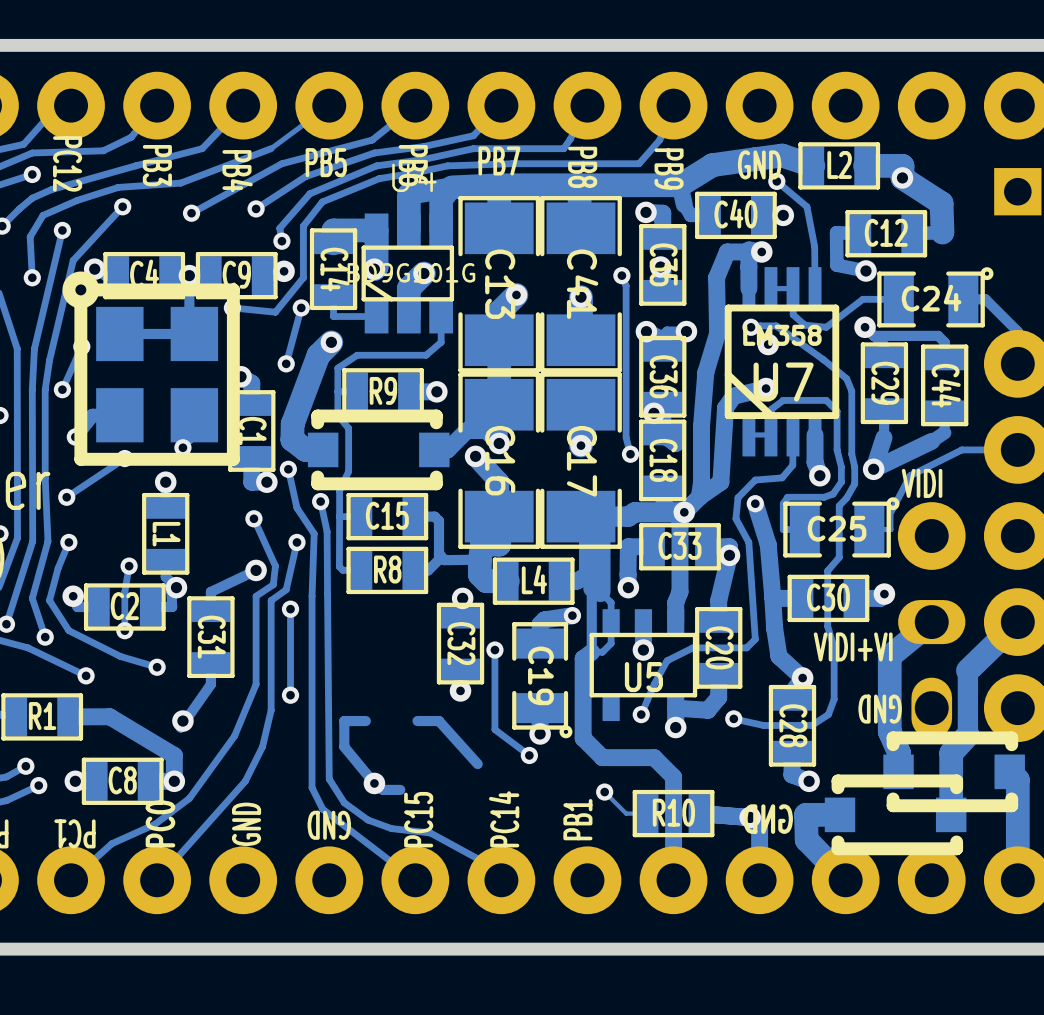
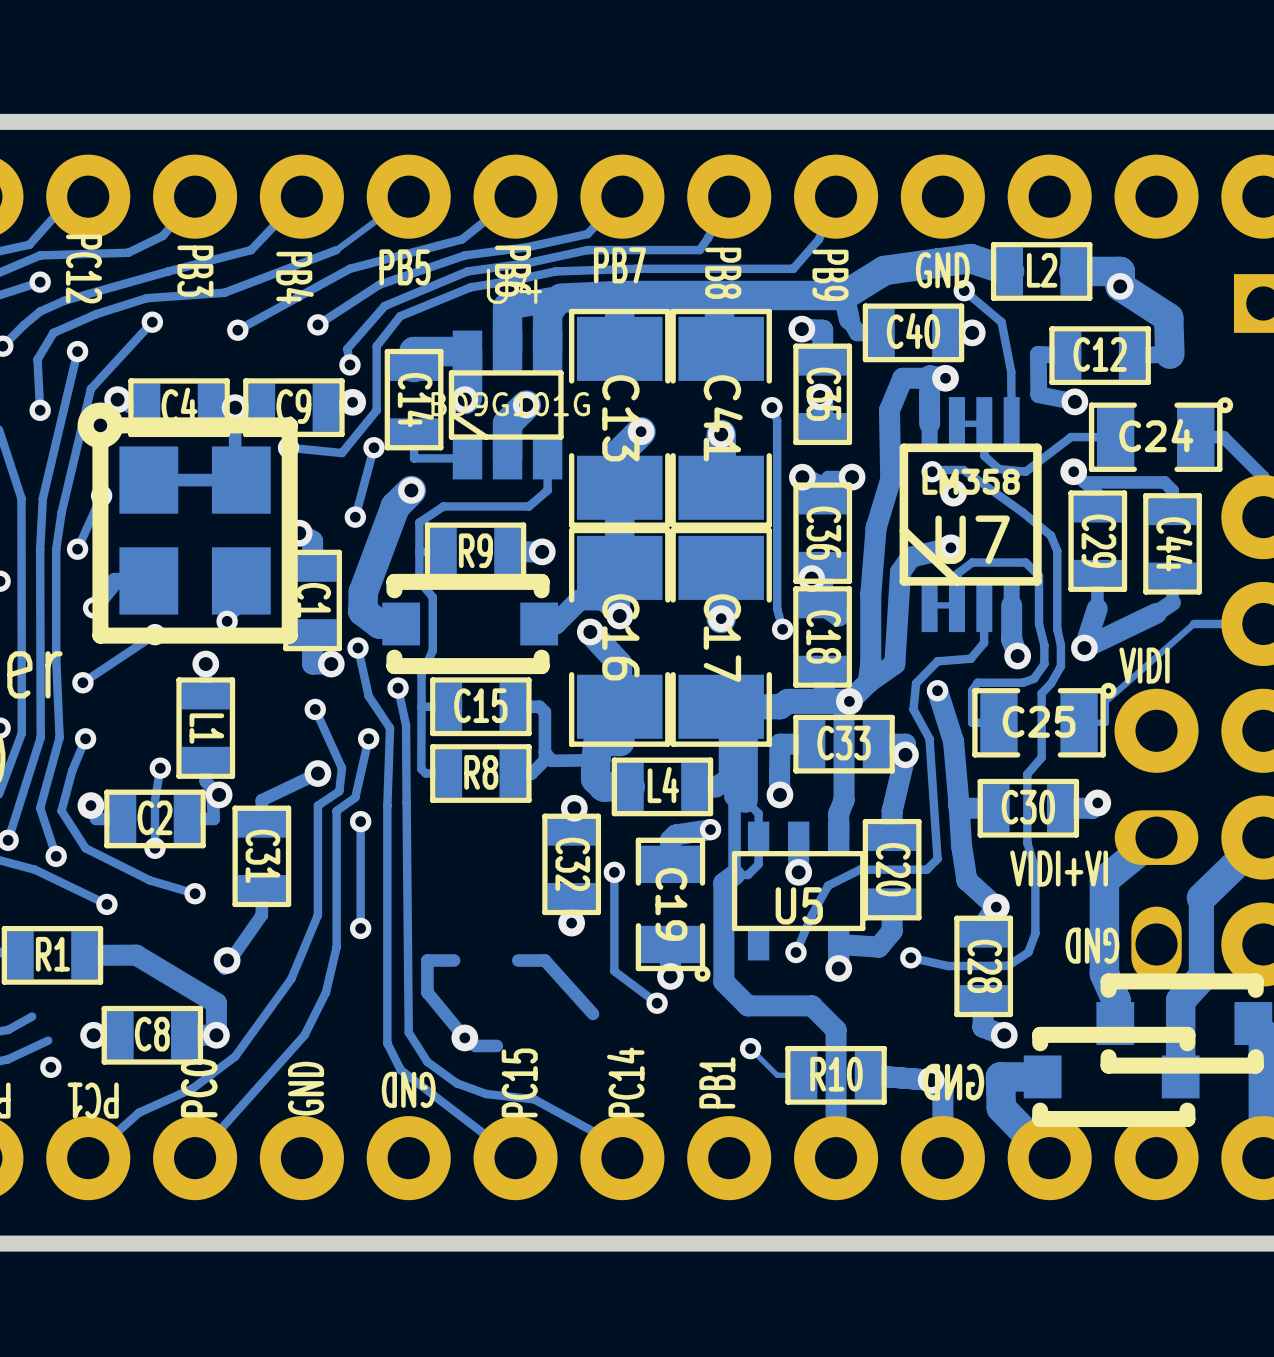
track: (961, 449) (910, 475) (890, 512) -> (1193, 623) (1105, 701)
via: (25, 766) -> none
via: (38, 785) -> none
via: none -> (50, 1067)

